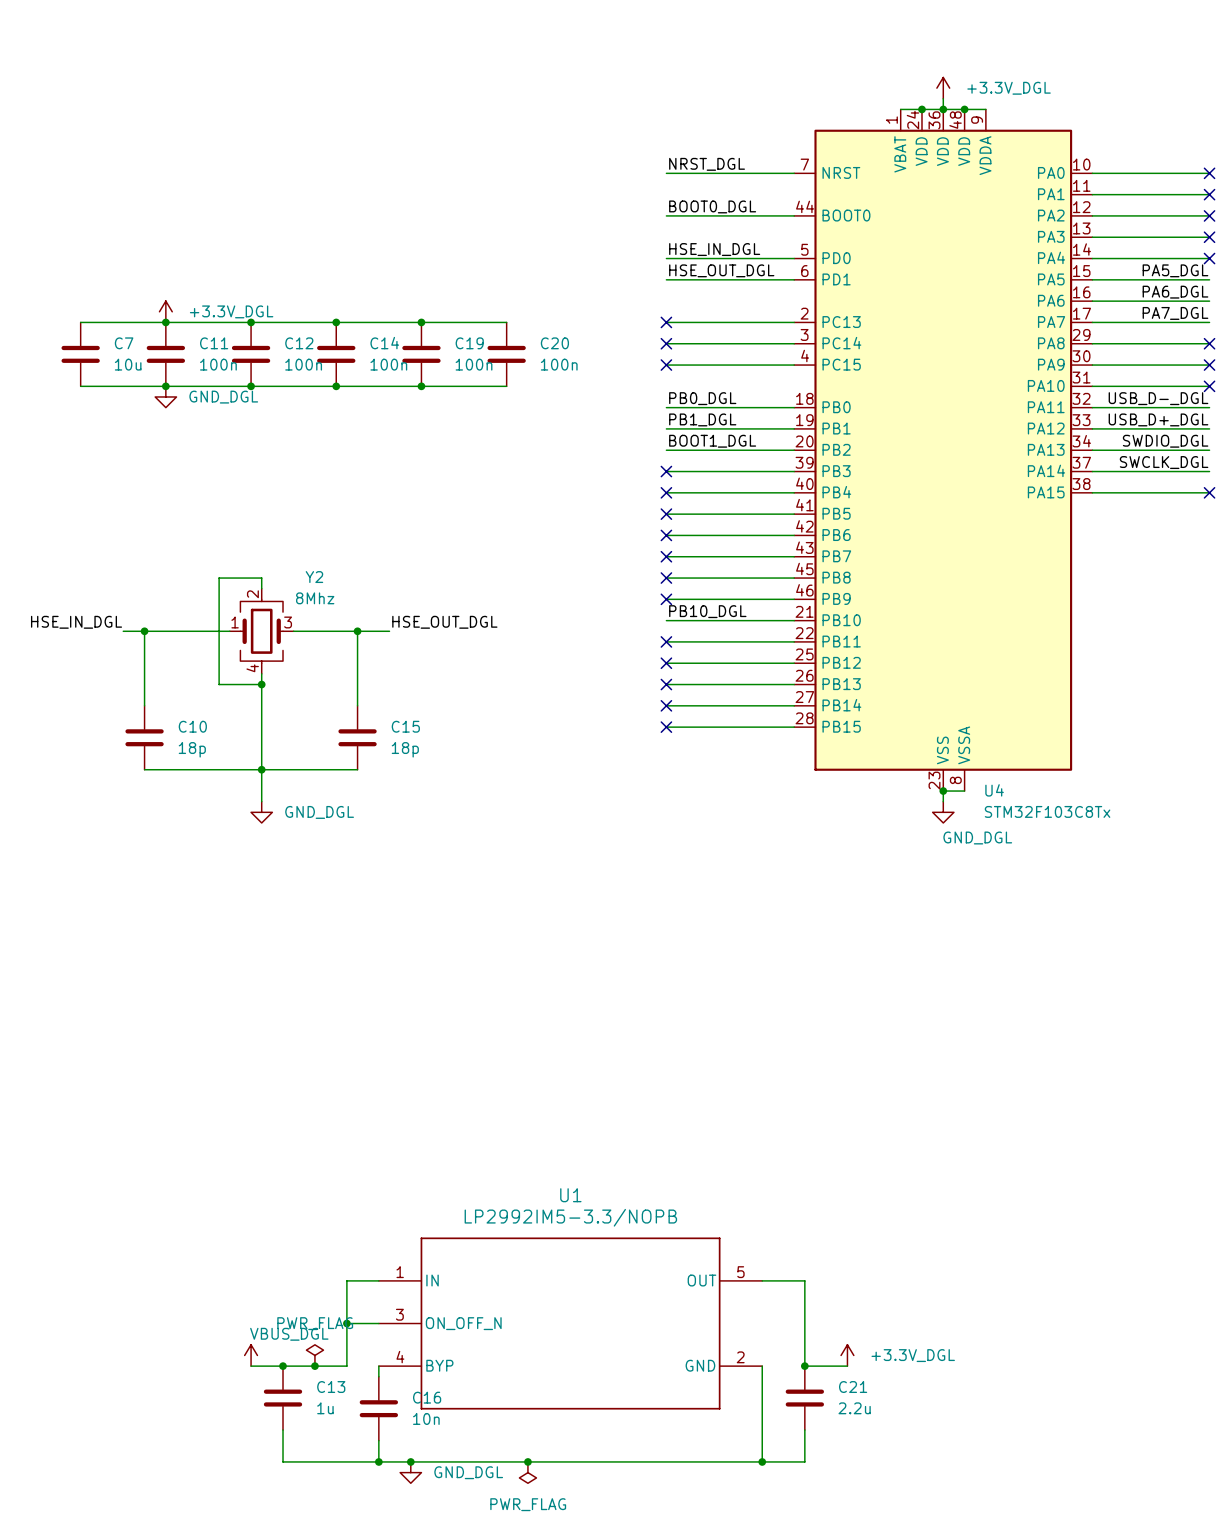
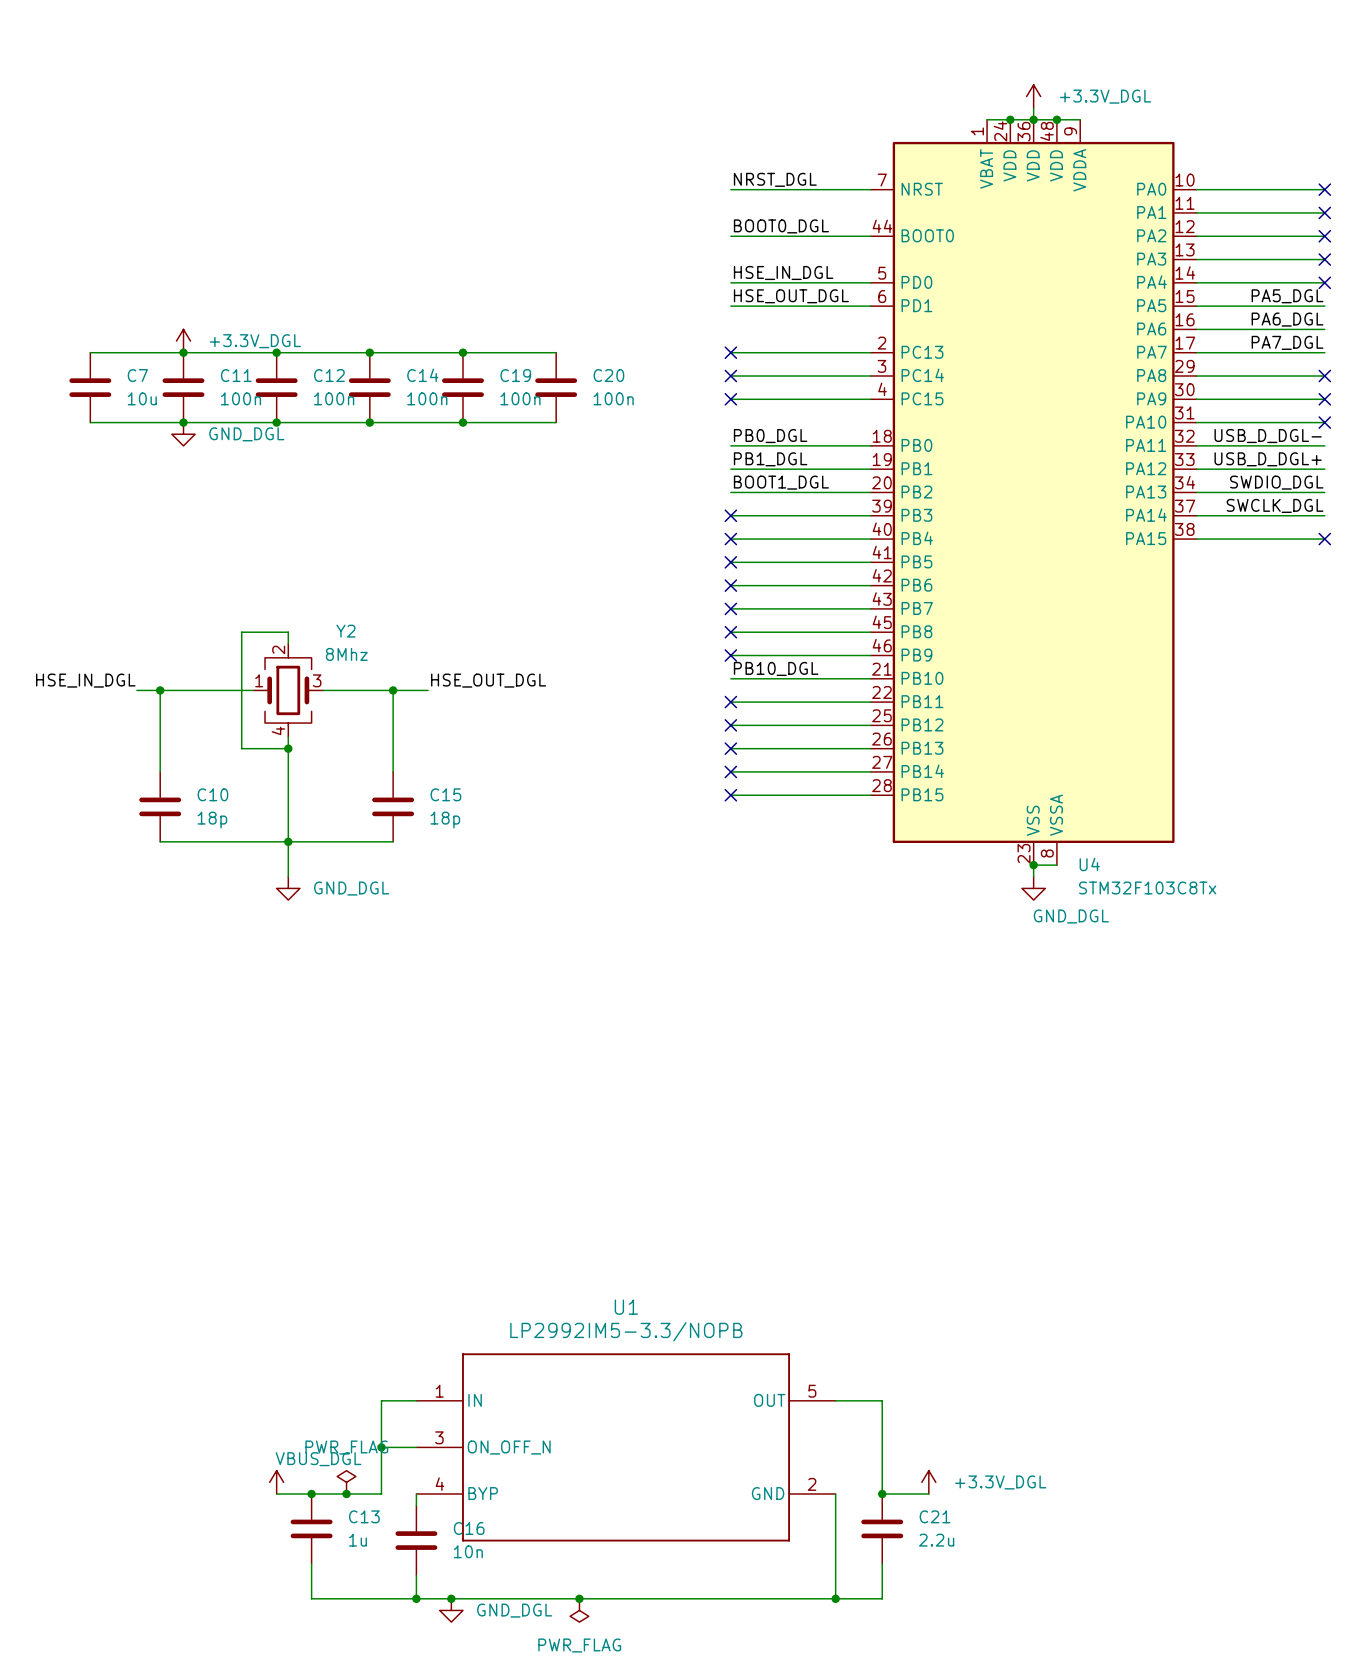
label: USB_D-_DGL (1158, 398) -> USB_D_DGL- (1268, 436)
label: USB_D+_DGL (1158, 419) -> USB_D_DGL+ (1268, 459)

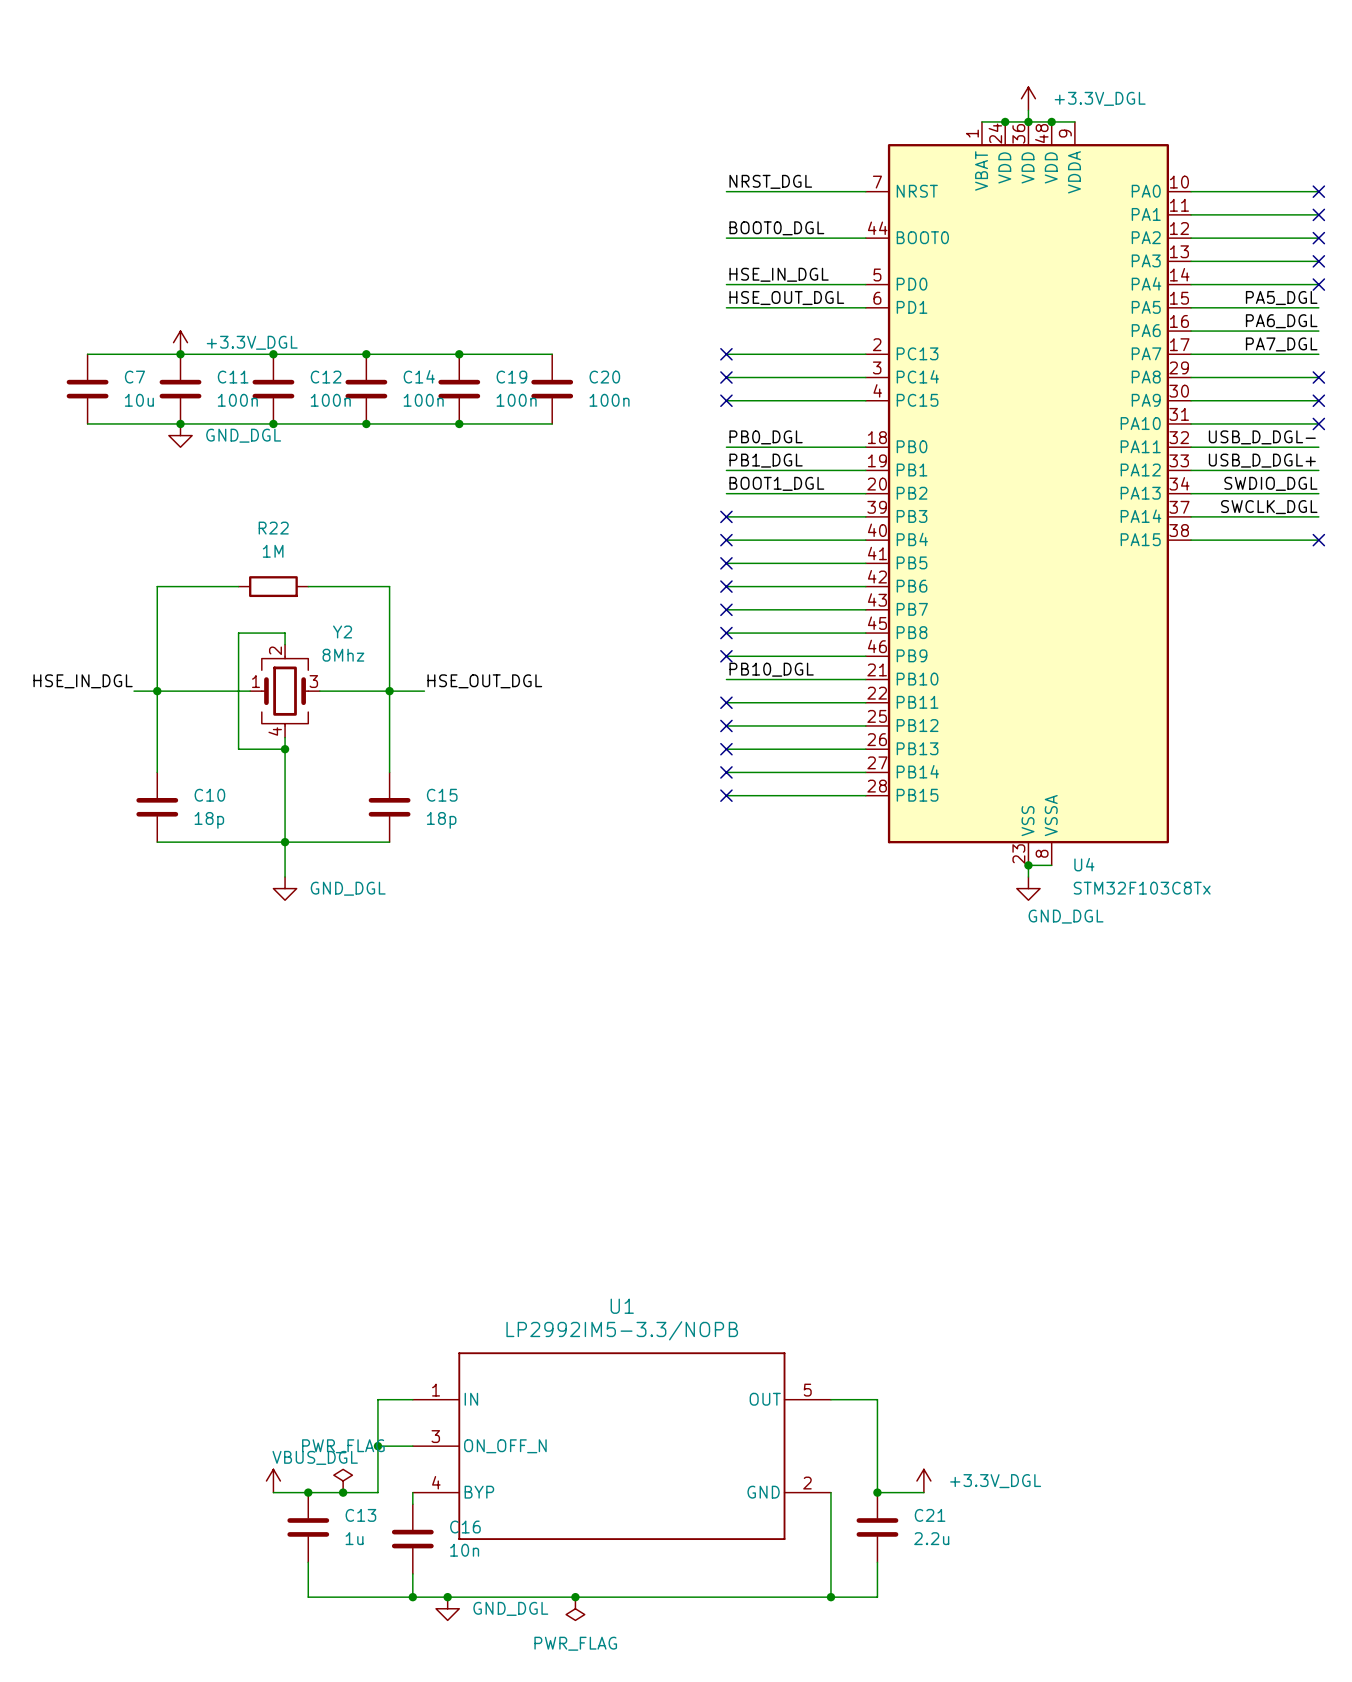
wire: none -> (238, 586) (157, 586) (157, 691)
R22: none -> 1M (273, 586)
wire: none -> (308, 586) (389, 586) (389, 691)

